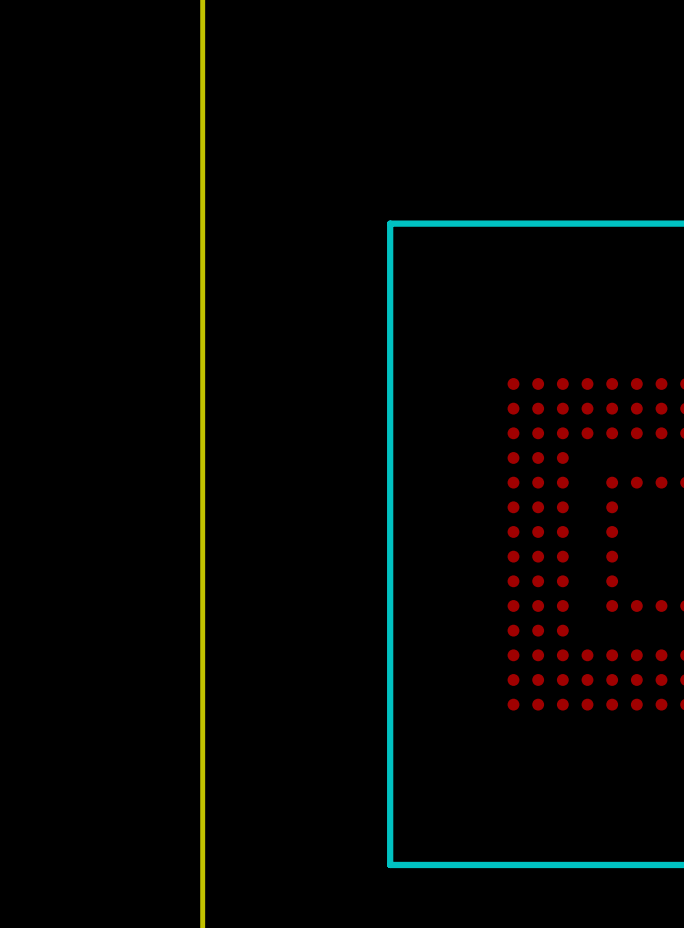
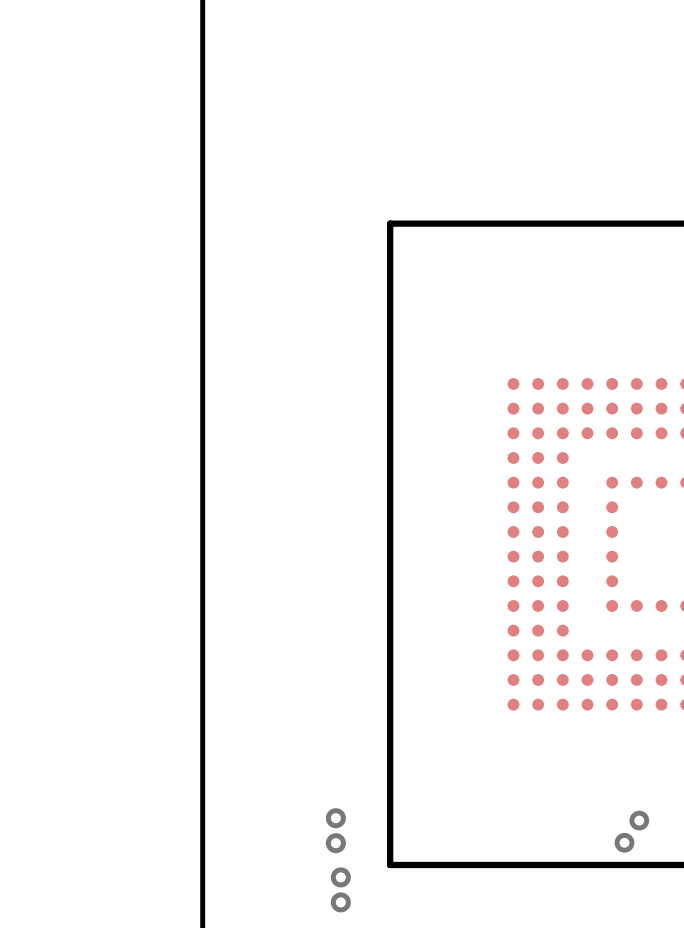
via: none -> (335, 818)
via: none -> (639, 820)
via: none -> (624, 842)
via: none -> (335, 843)
via: none -> (340, 877)
via: none -> (340, 902)

